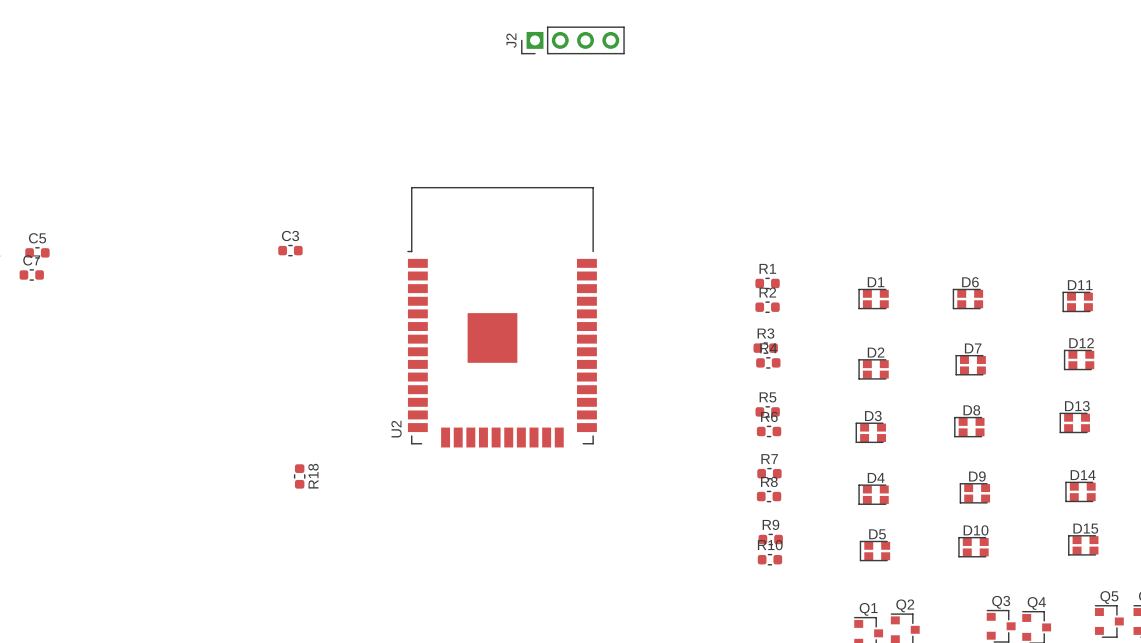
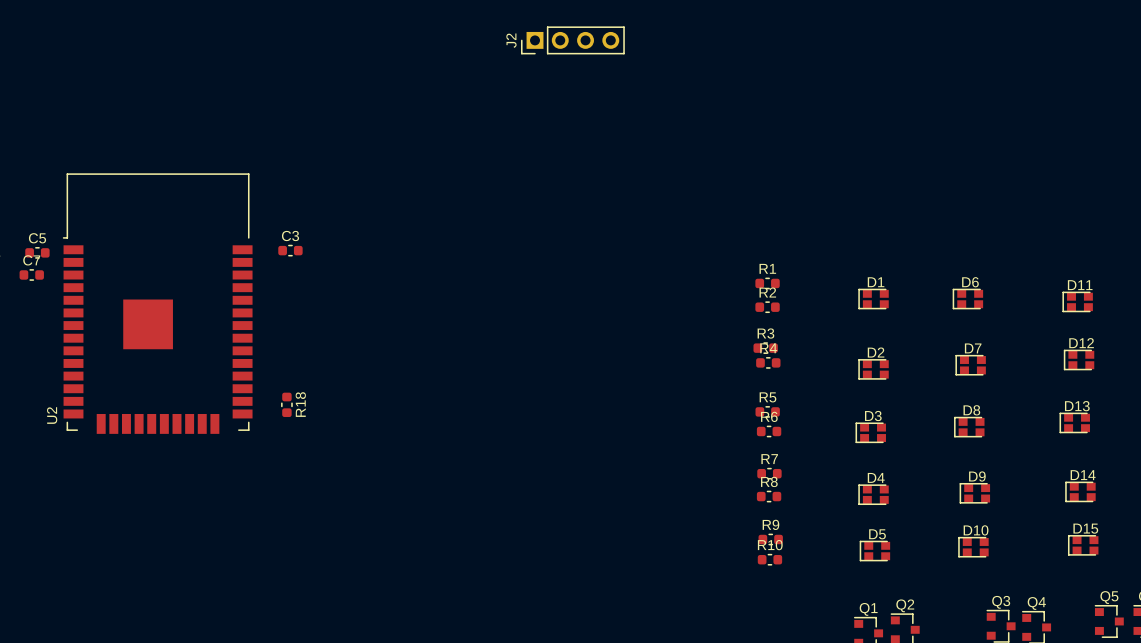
U2 position: (502, 317) -> (157, 303)
R18 position: (299, 476) -> (286, 404)

